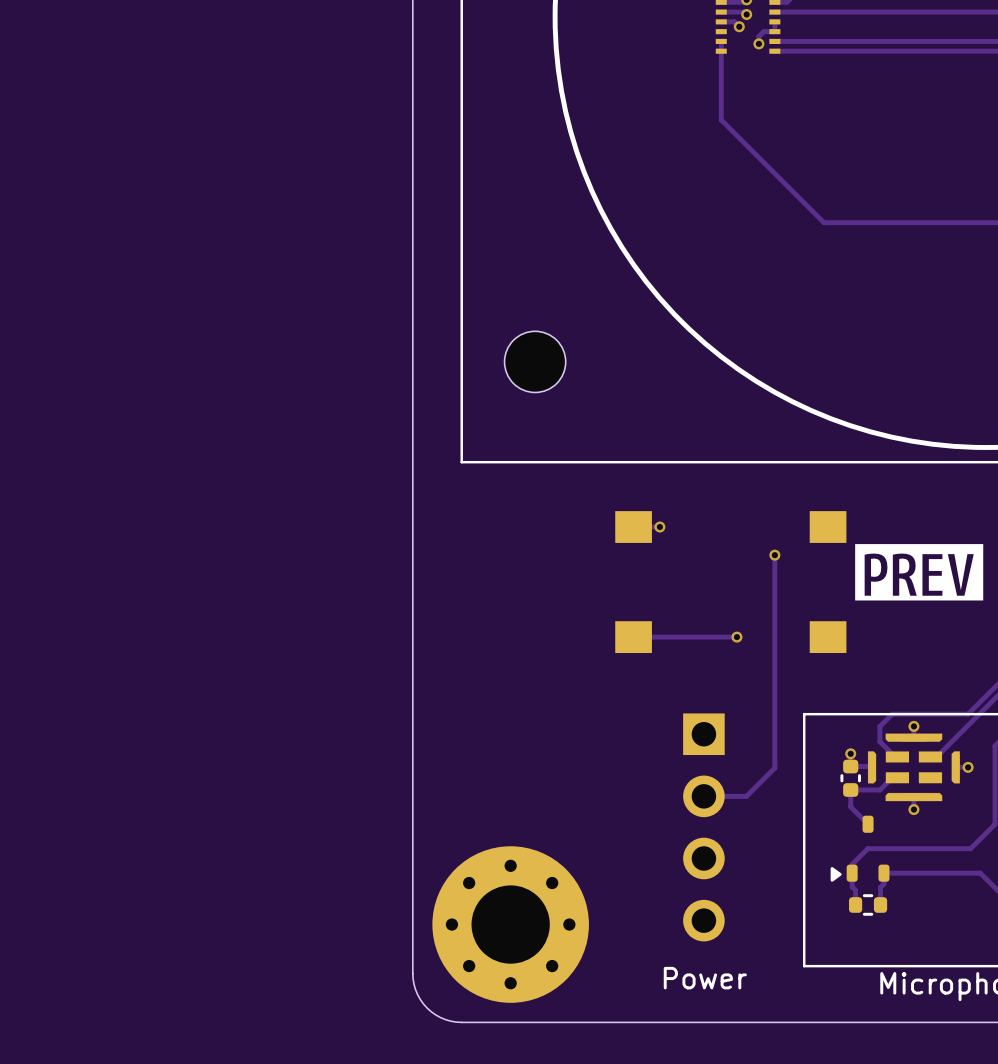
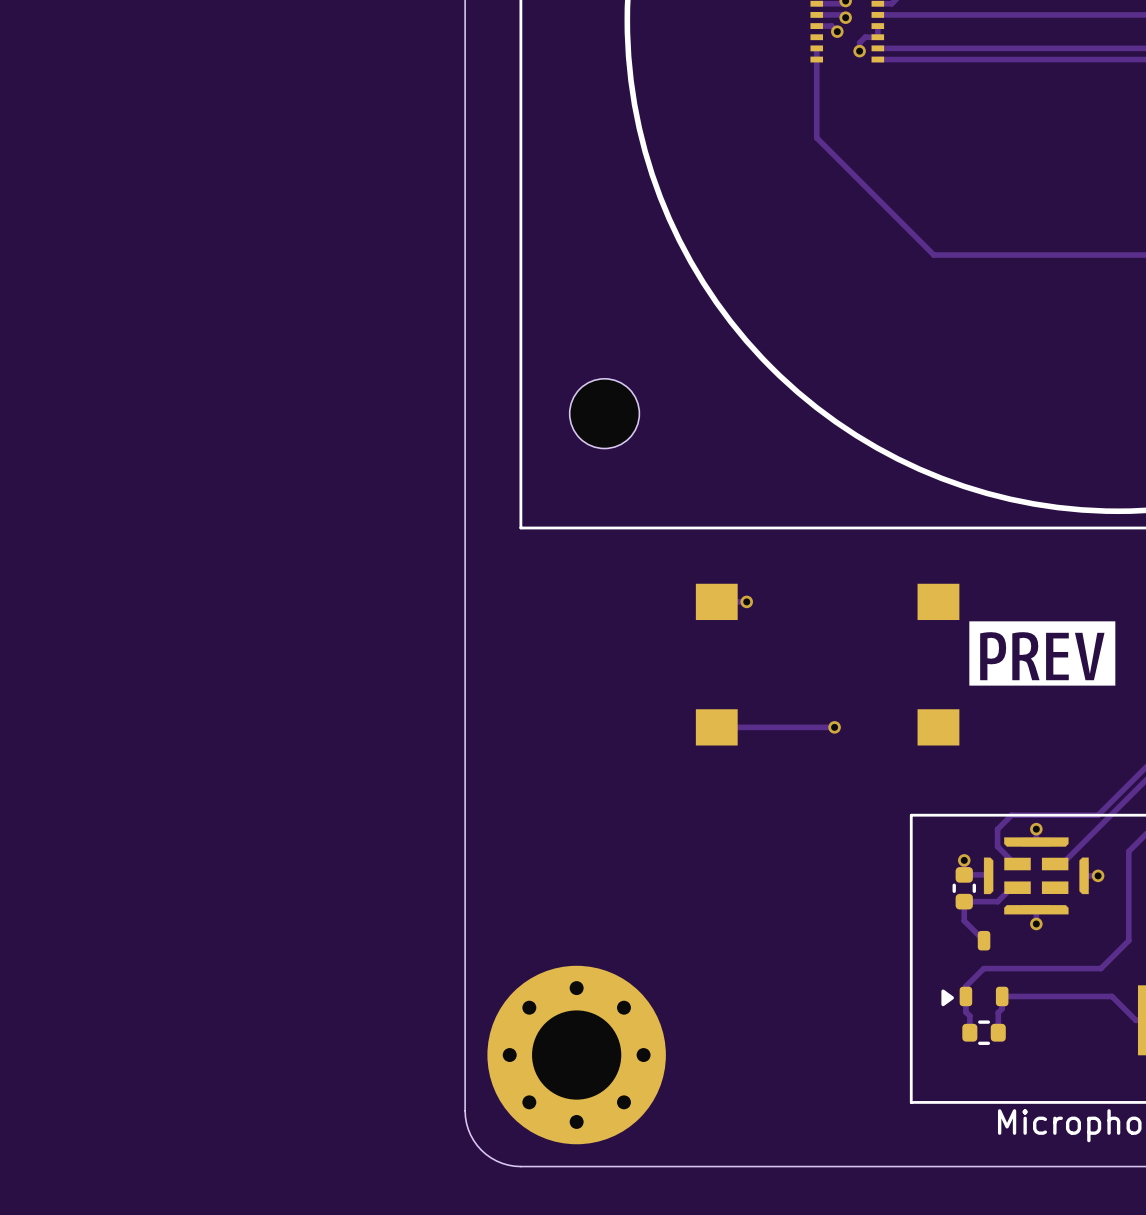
track: (774, 555) (774, 767) (746, 796) (703, 796) -> none
via: (774, 555) -> none
part: Power (703, 827) -> none

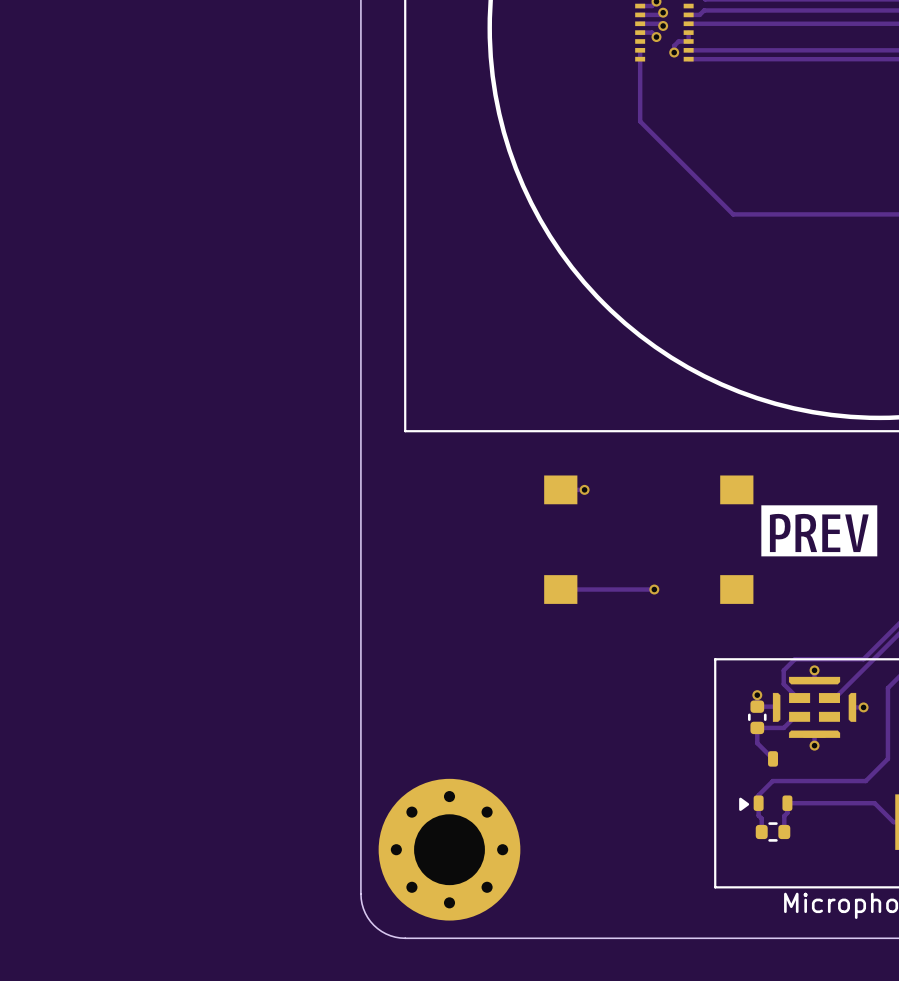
part: (604, 413) -> none

